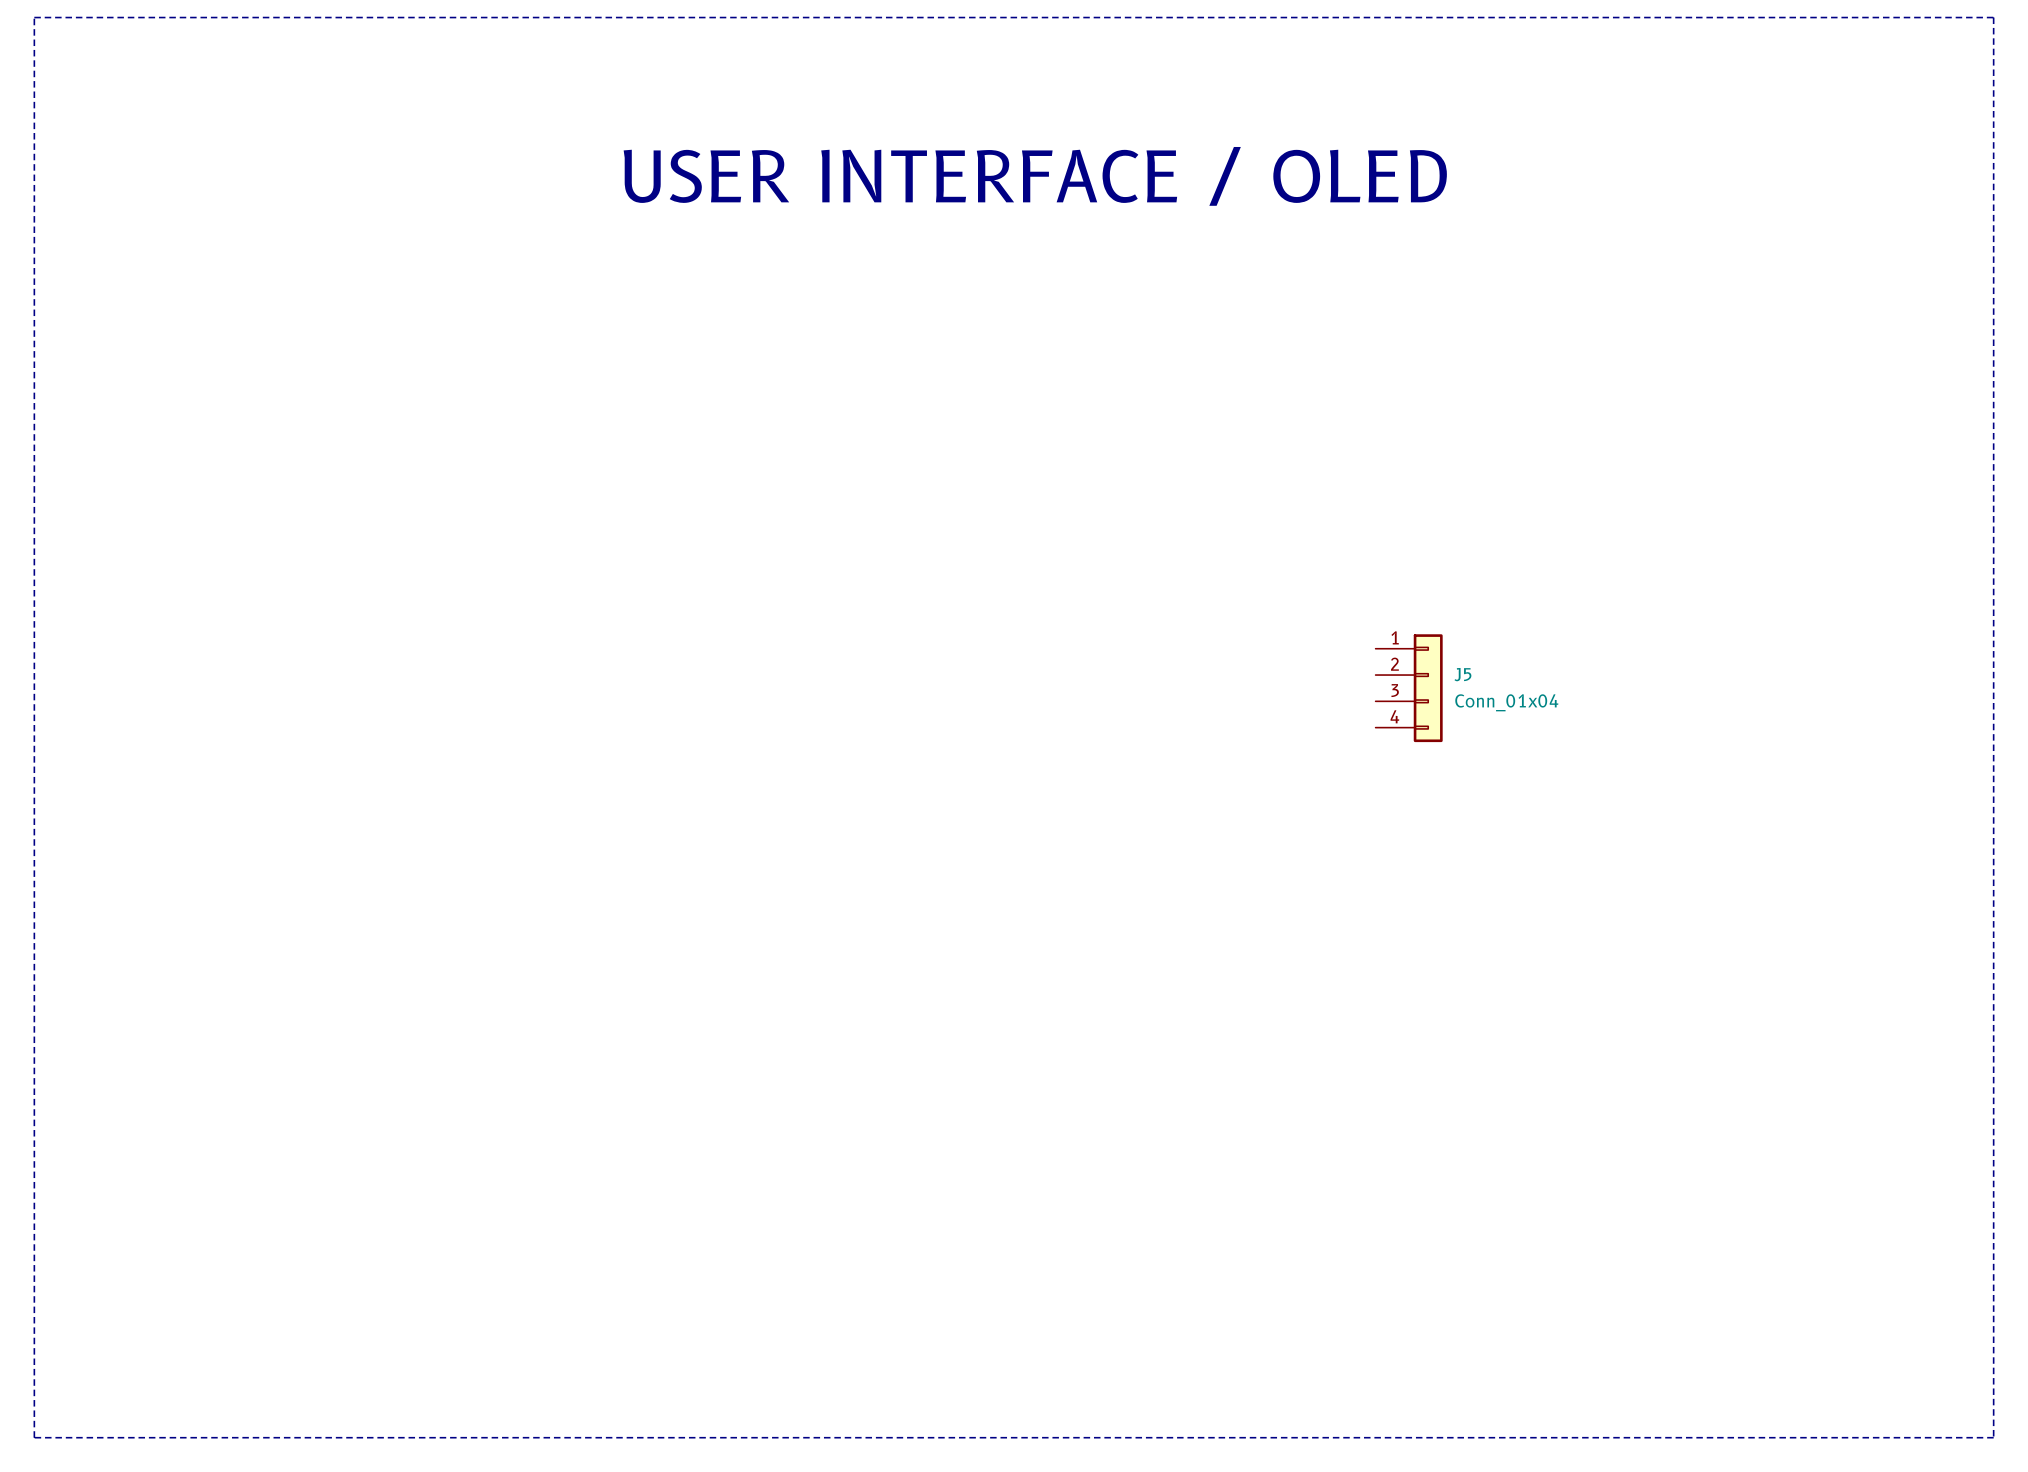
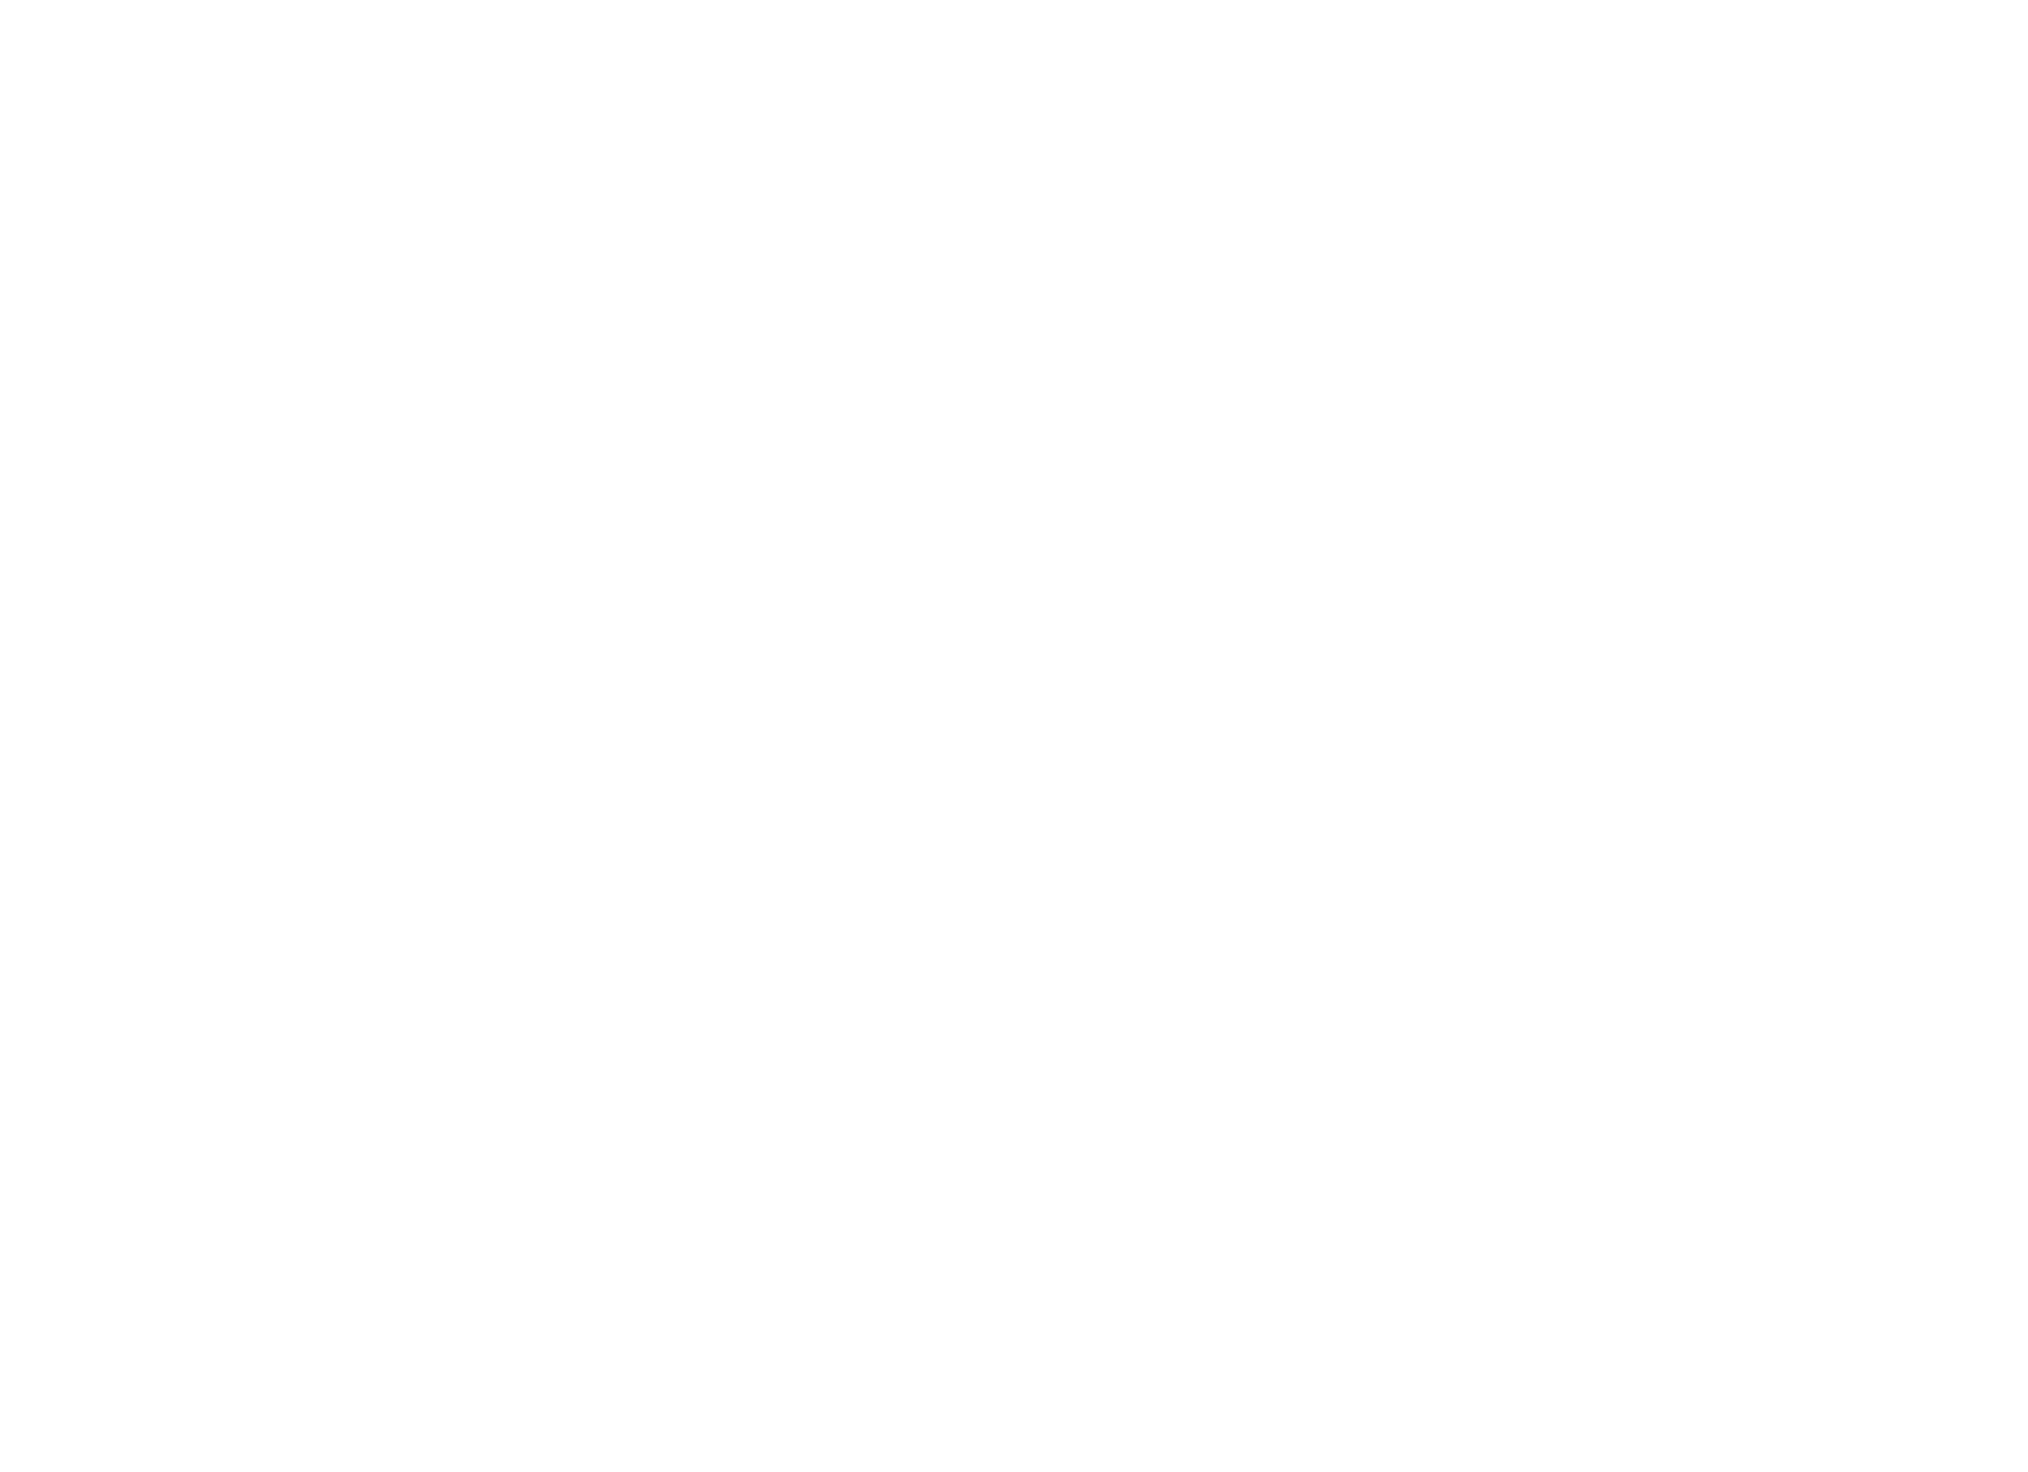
line: (34, 17) (1993, 17) (1993, 1437) (34, 1437) (34, 17) -> none
text: USER INTERFACE / OLED (1035, 176) -> none
J5: Conn_01x04 (1409, 688) -> none

